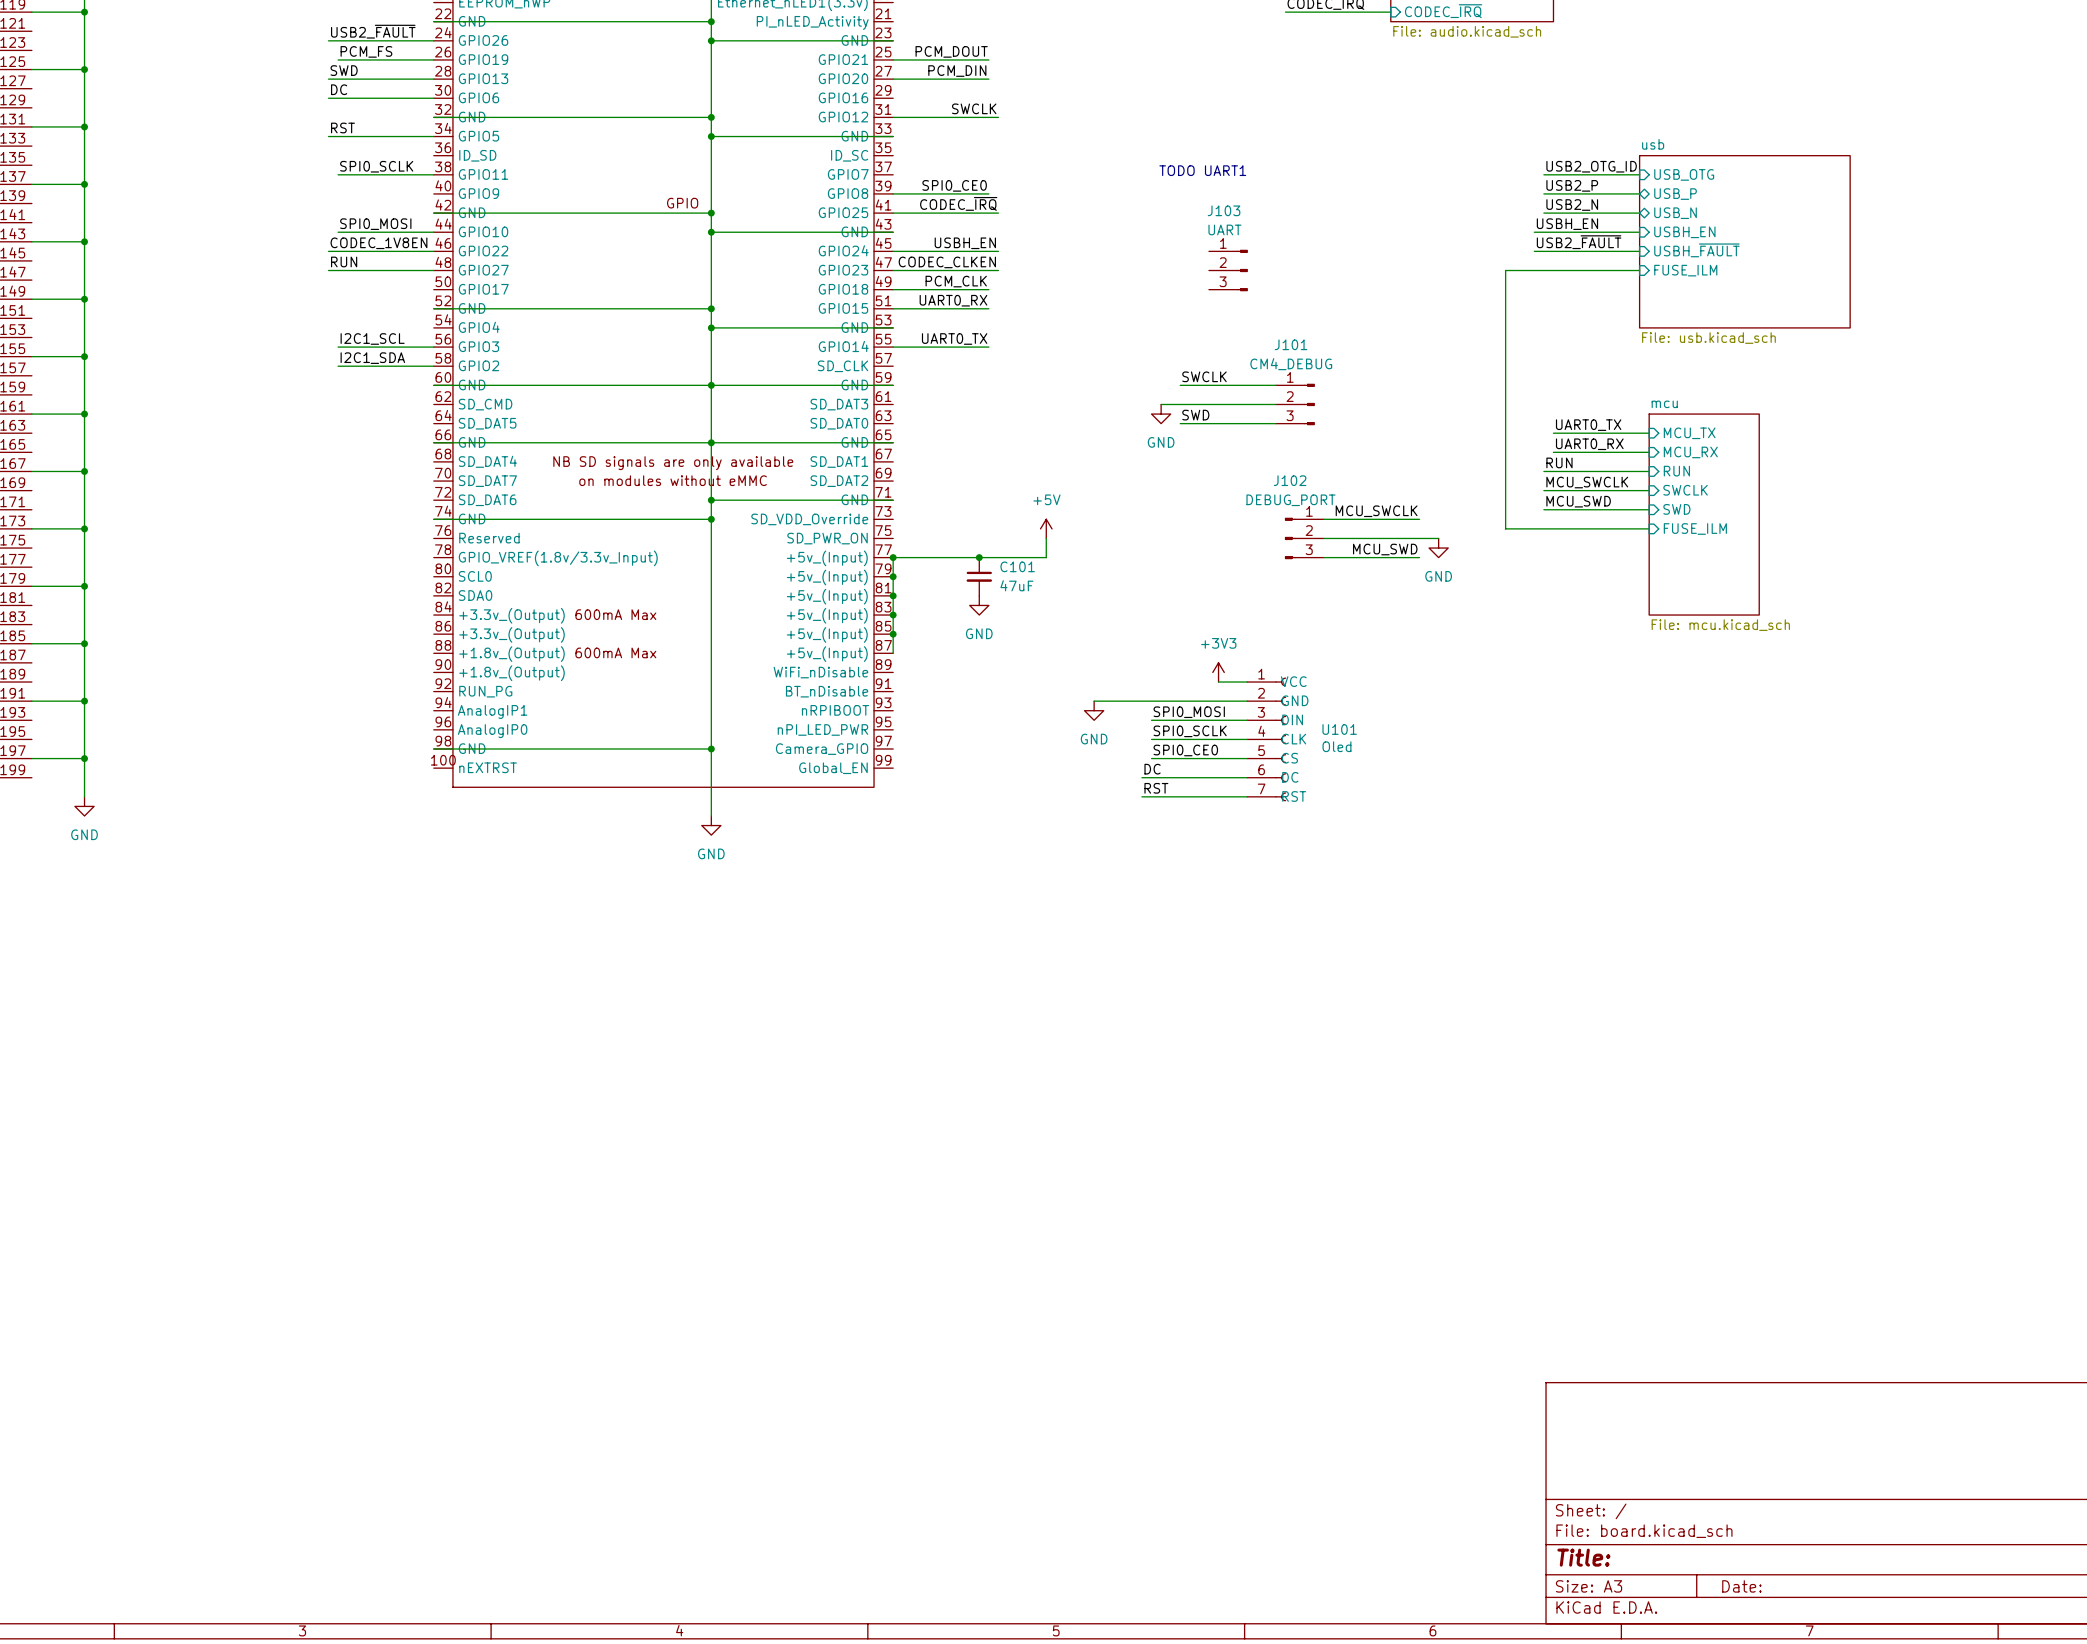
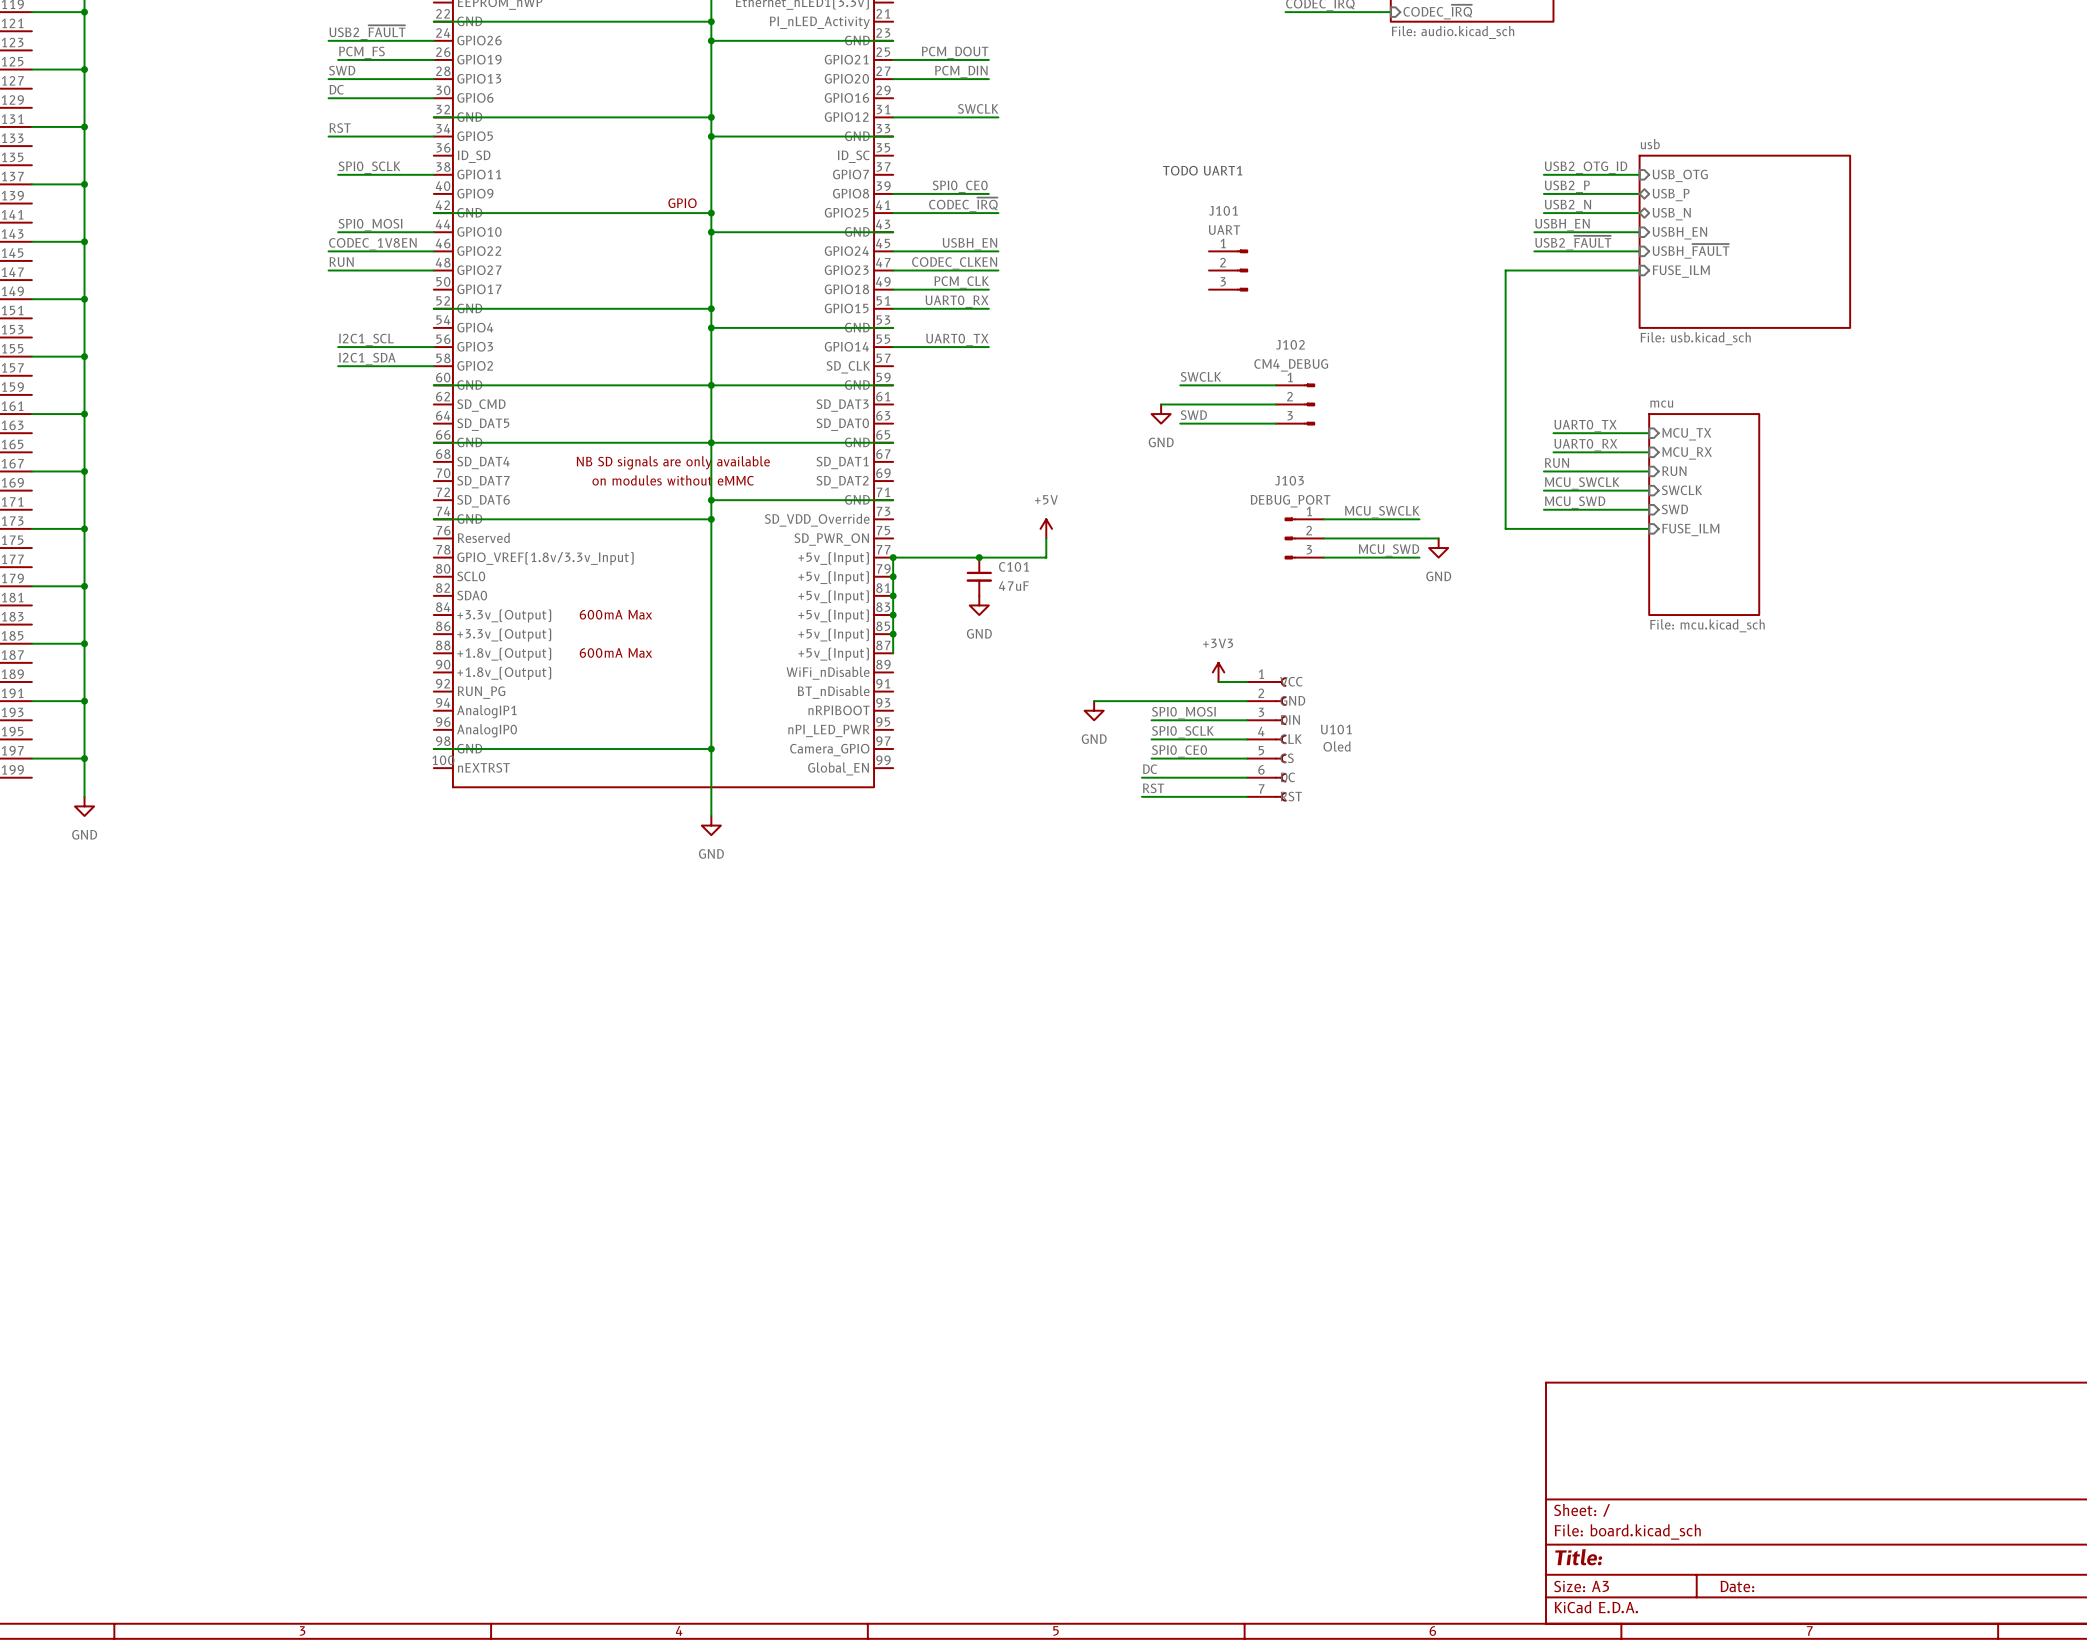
J103 name: J103 (1224, 210) -> J101 (1223, 210)
J101 name: J101 (1291, 344) -> J102 (1290, 344)
J102 name: J102 (1290, 480) -> J103 (1289, 480)

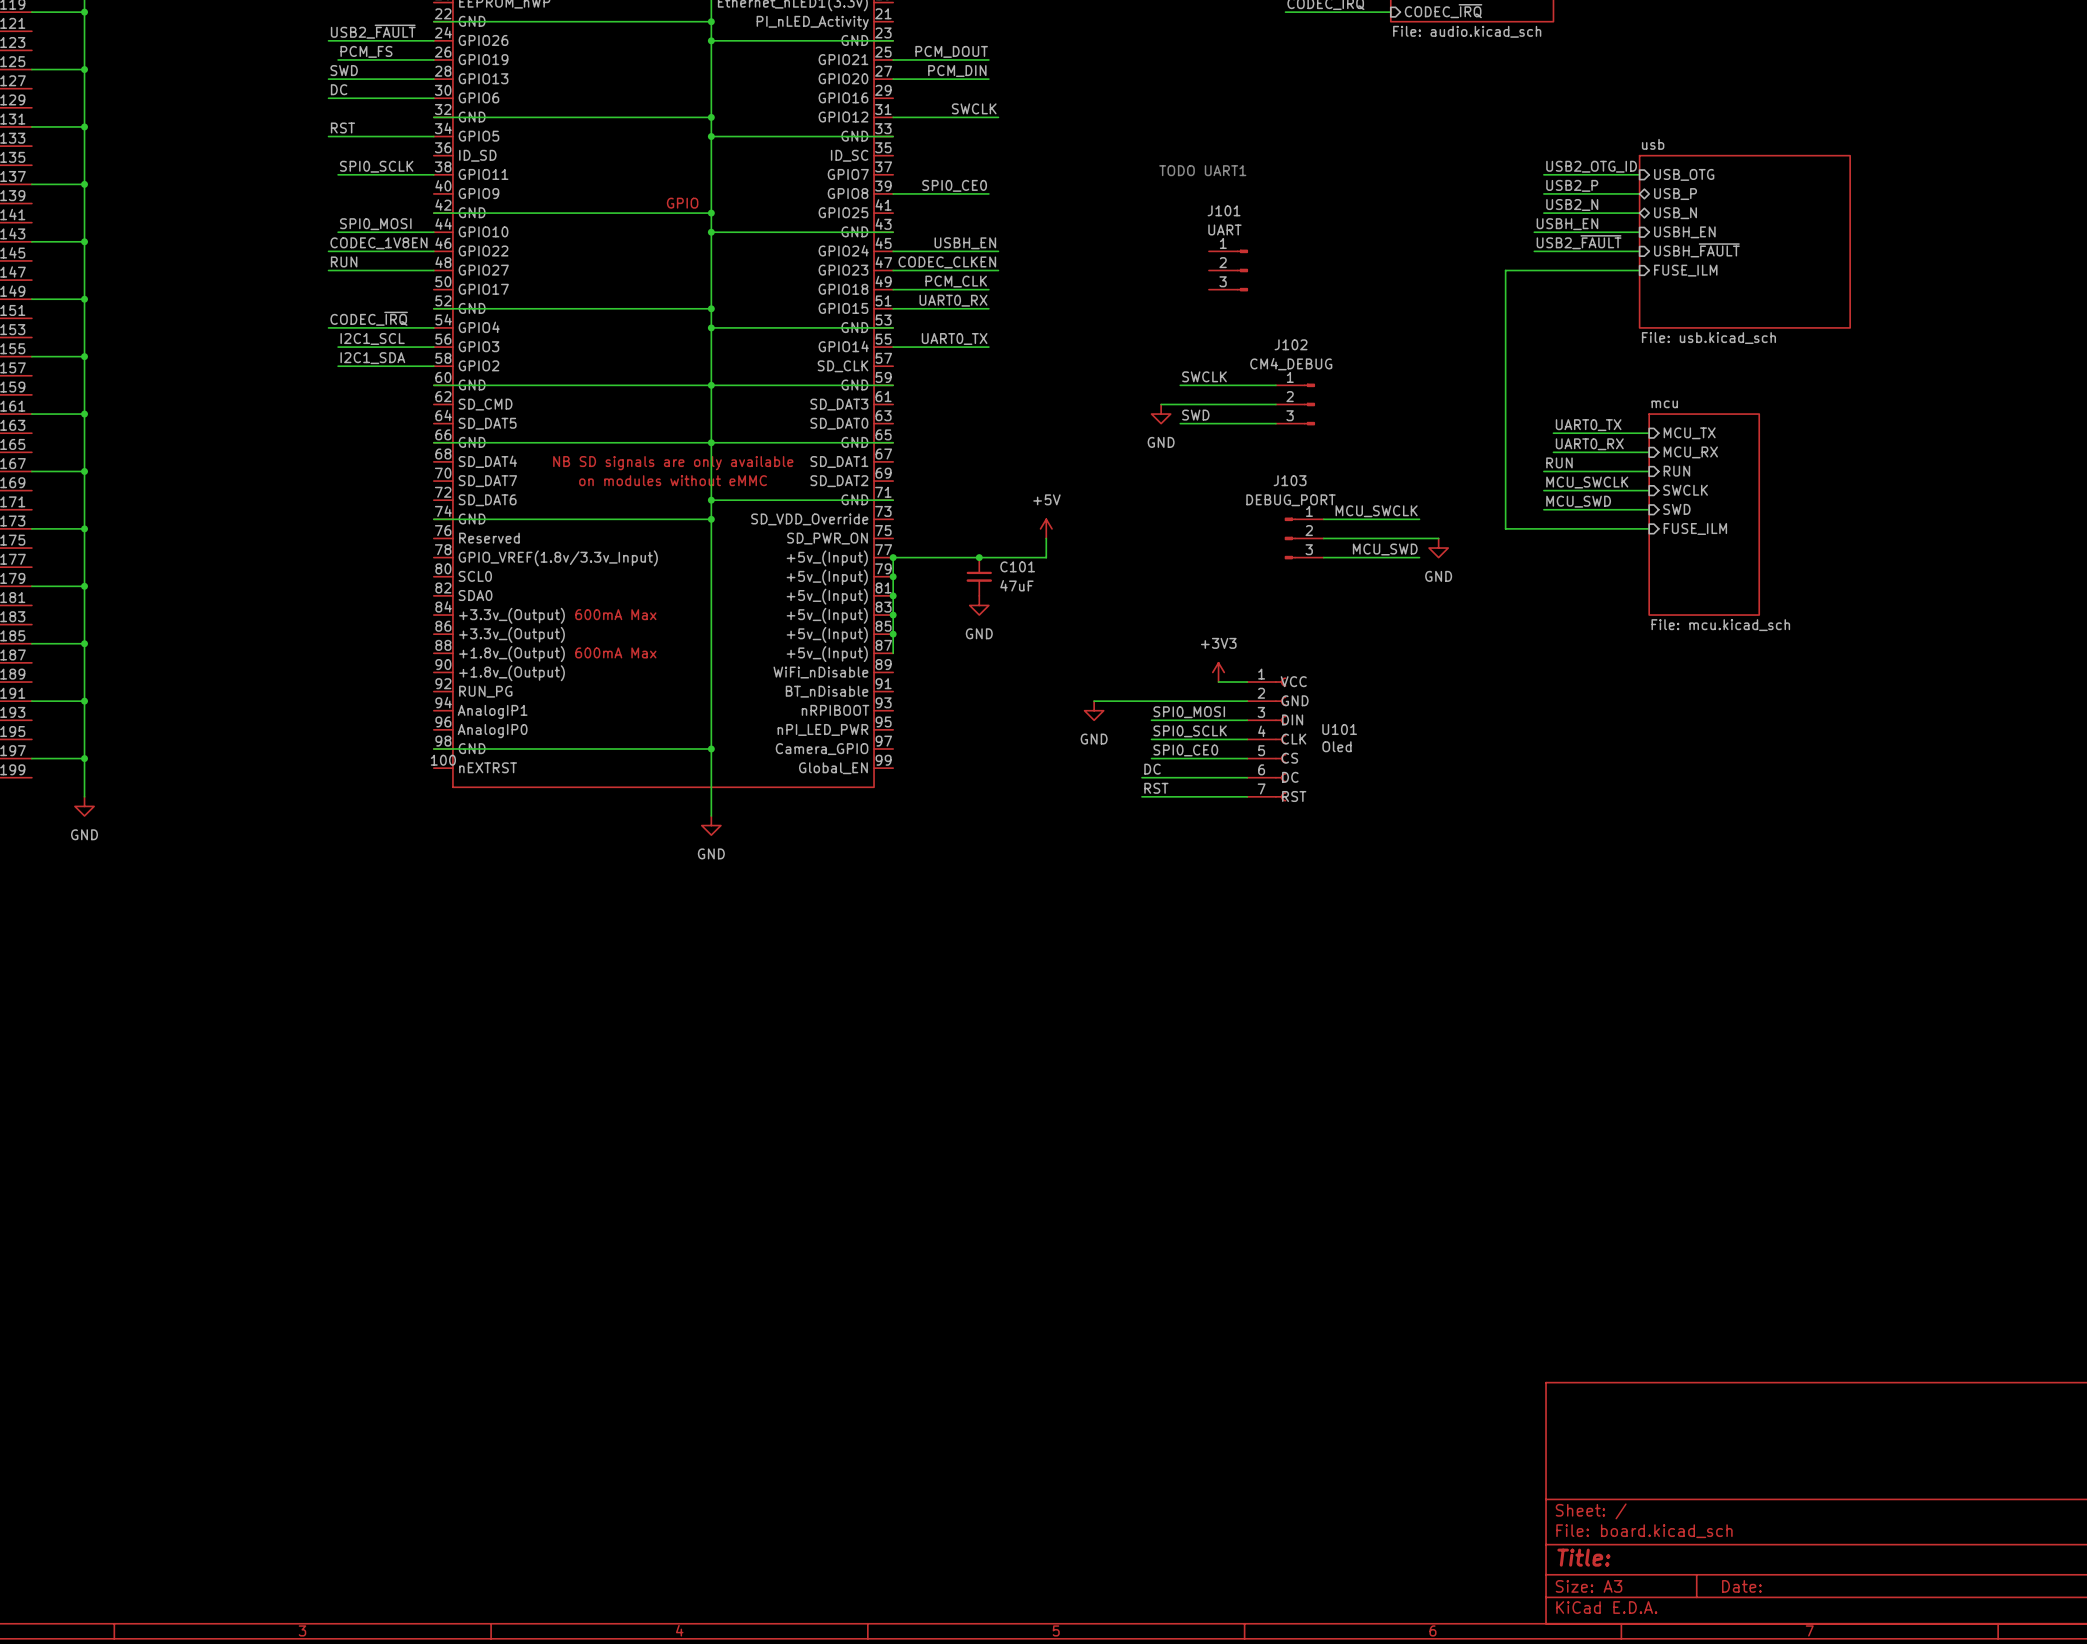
label: CODEC_~{IRQ} (963, 204) -> none
wire: (893, 213) (998, 213) -> none
label: none -> CODEC_~{IRQ} (369, 318)
wire: none -> (328, 327) (433, 327)

